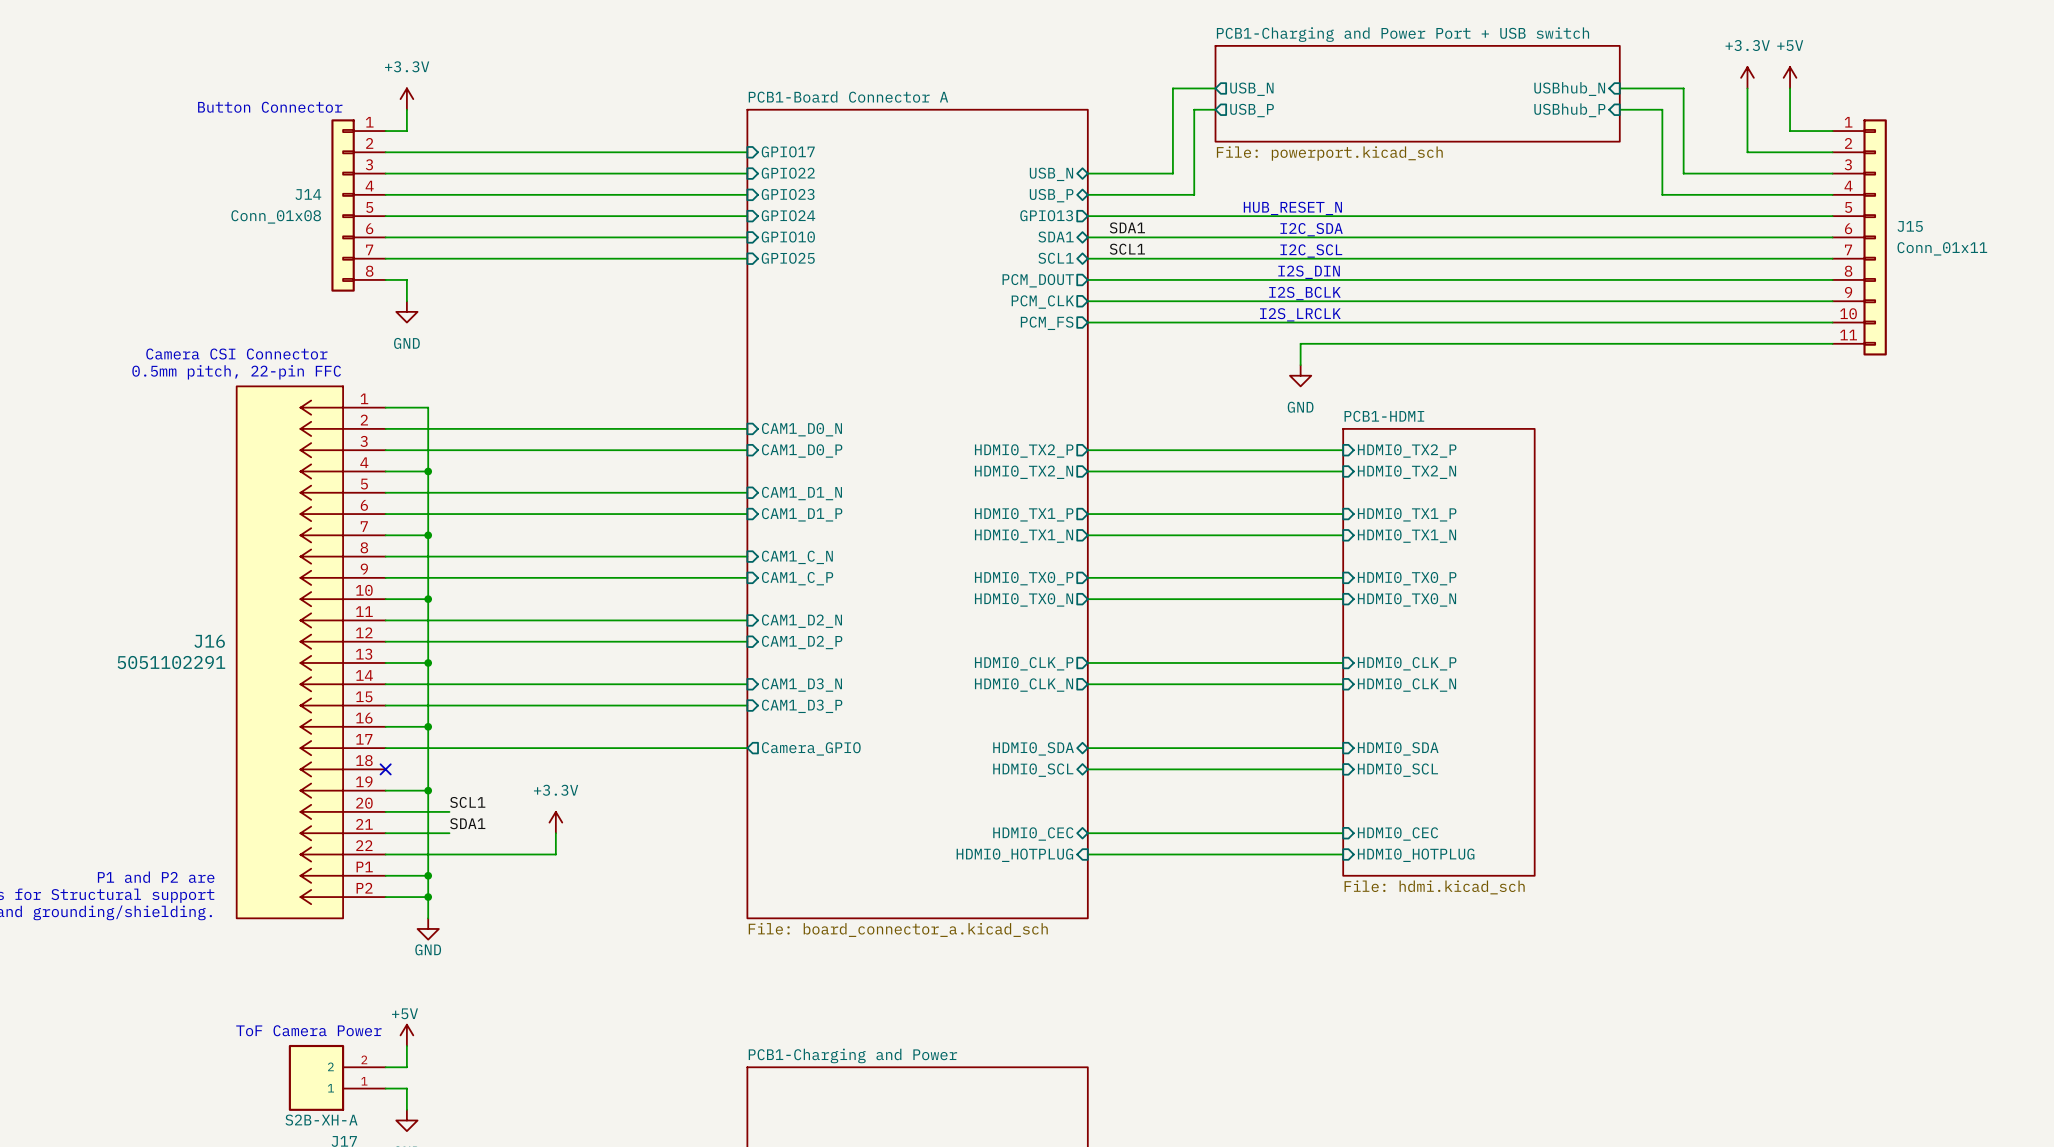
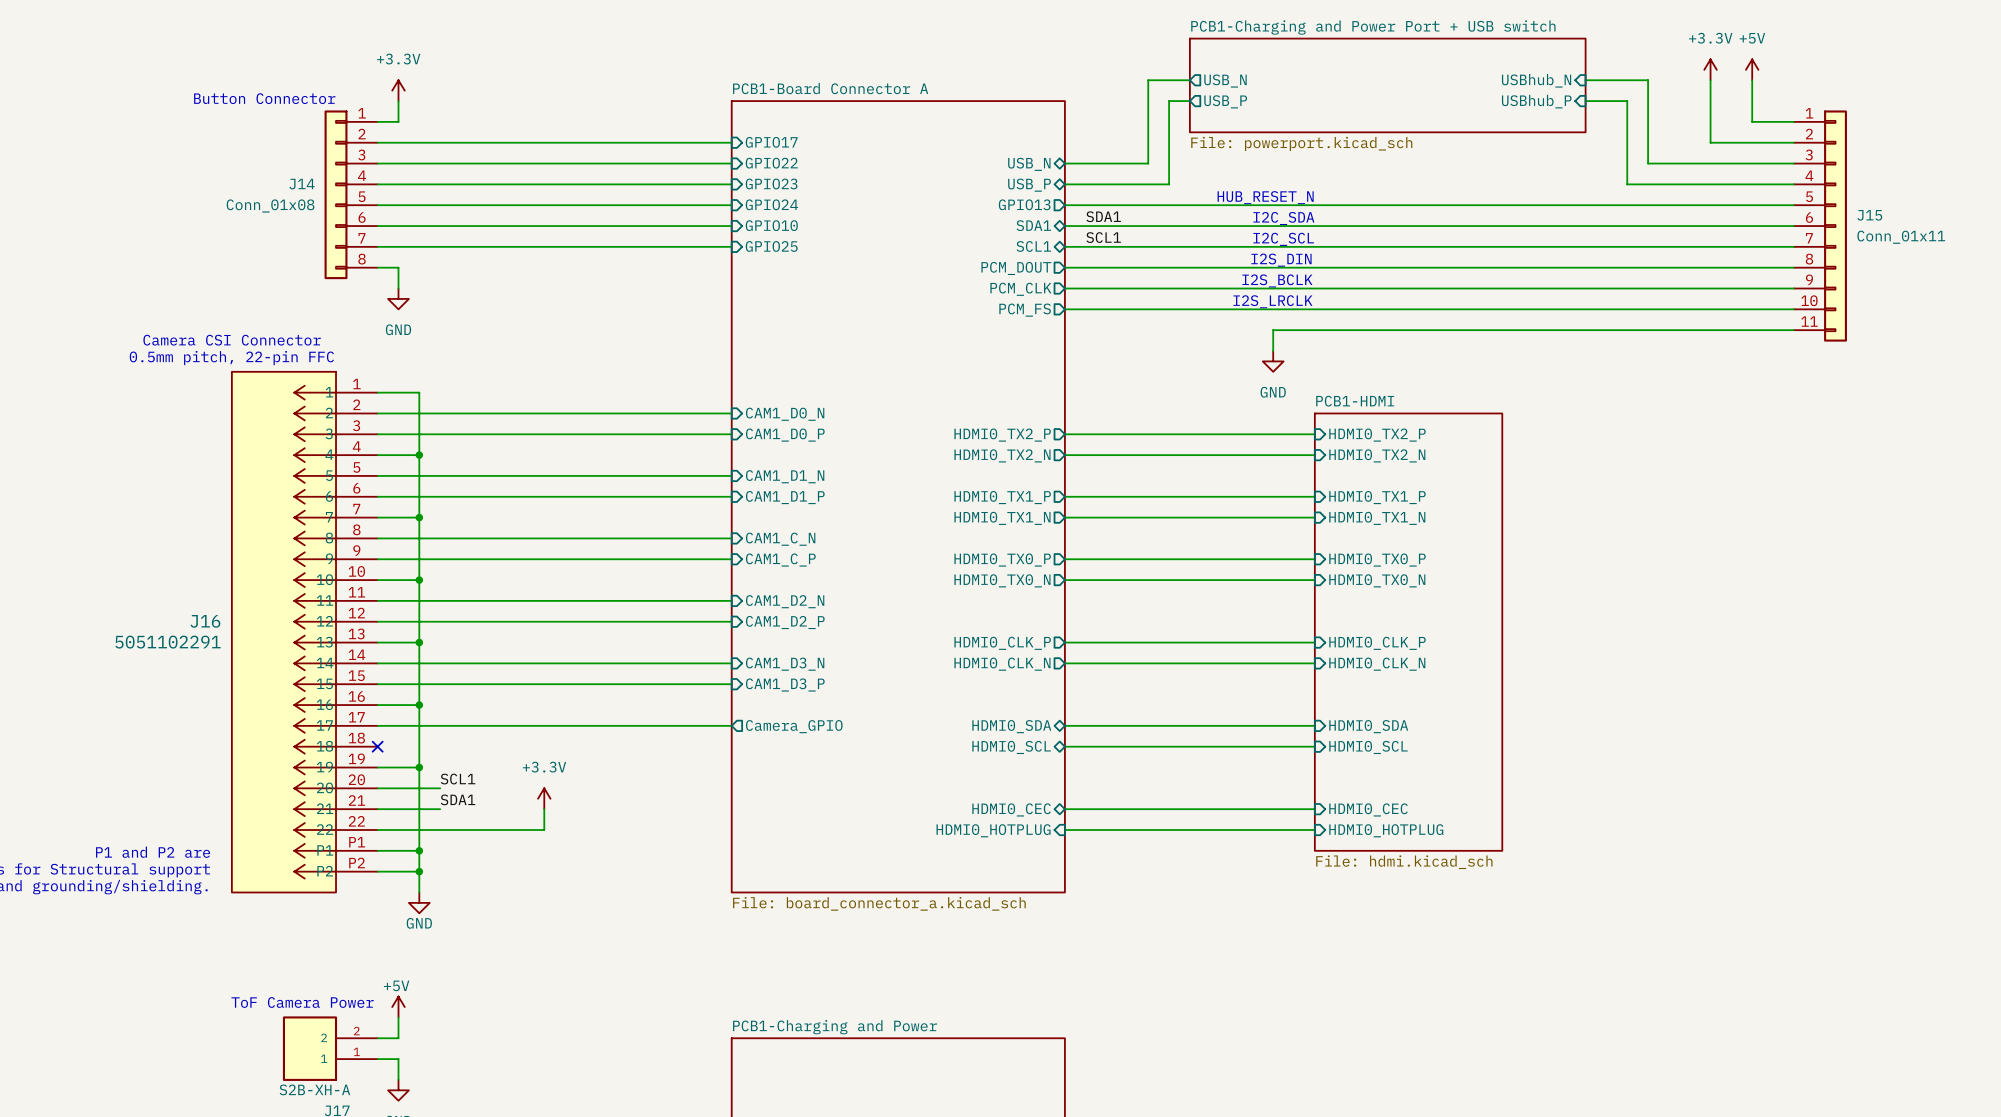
J16 symbol: [236, 386, 386, 919] -> [231, 371, 378, 893]

